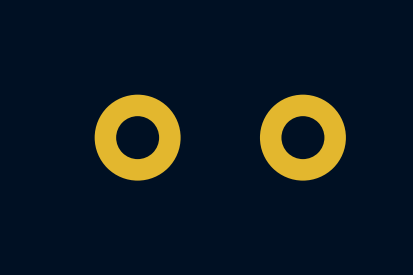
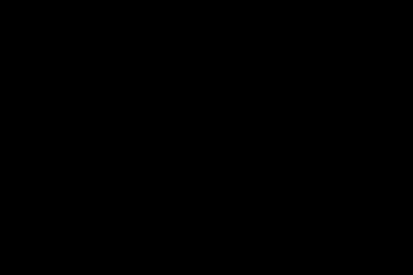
part: (220, 137) -> none

